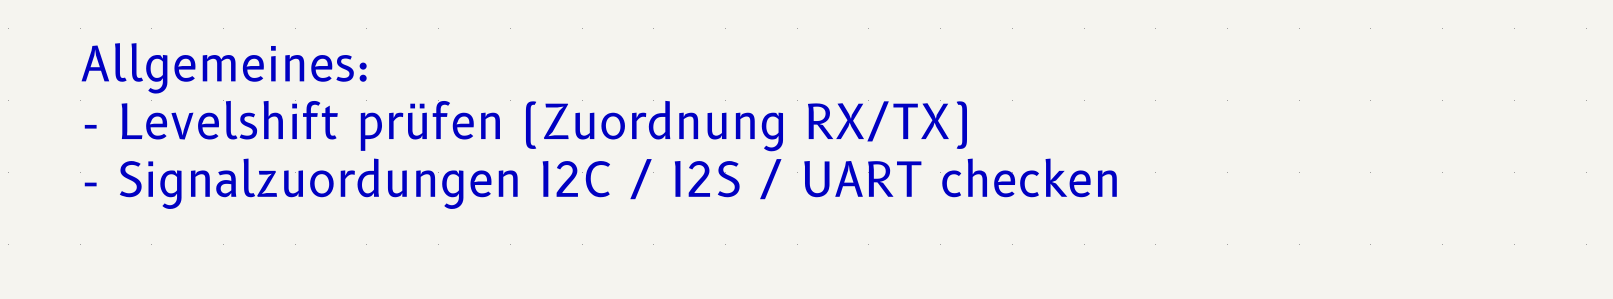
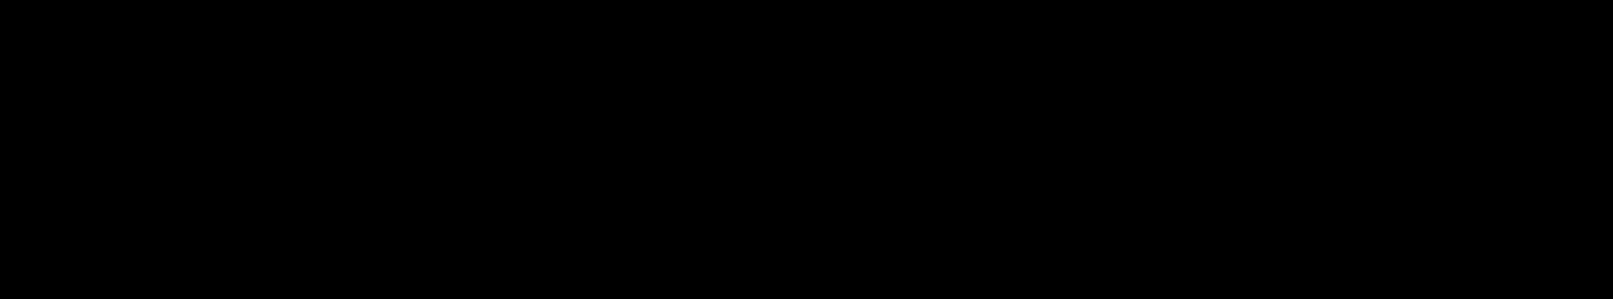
text: Allgemeines: (224, 68) -> none
text: - Levelshift prüfen (Zuordnung RX/TX) (525, 126) -> none
text: - Signalzuordungen I2C / I2S / UART checken (600, 183) -> none

